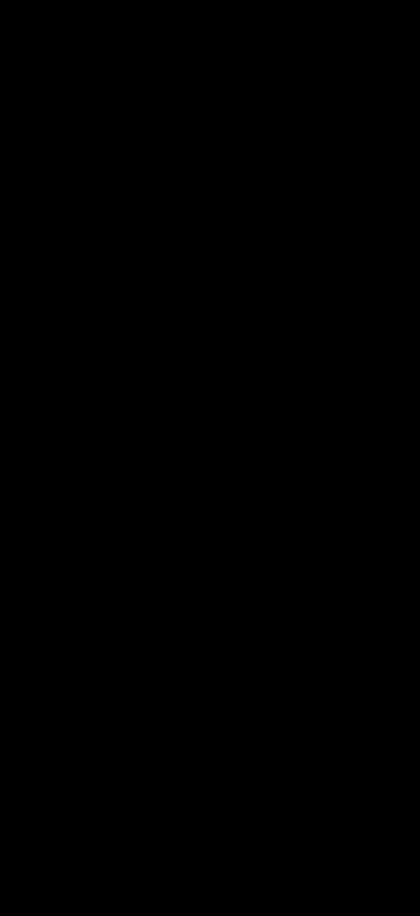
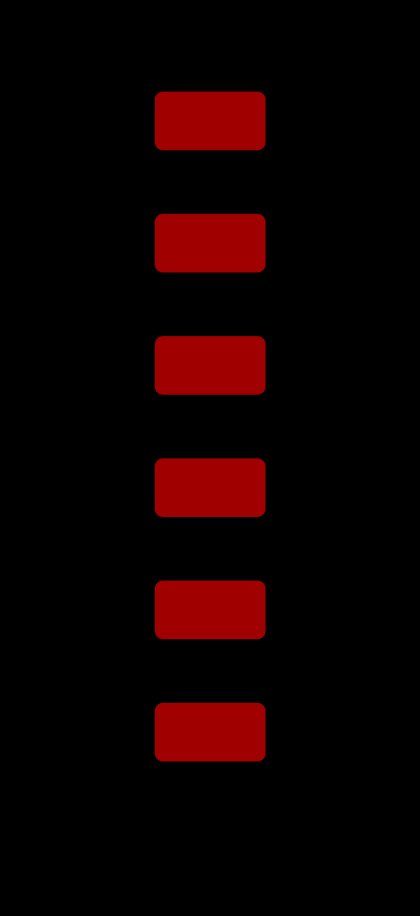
part: none -> (210, 120)
part: none -> (210, 243)
part: none -> (210, 365)
part: none -> (210, 487)
part: none -> (210, 609)
part: none -> (210, 732)

